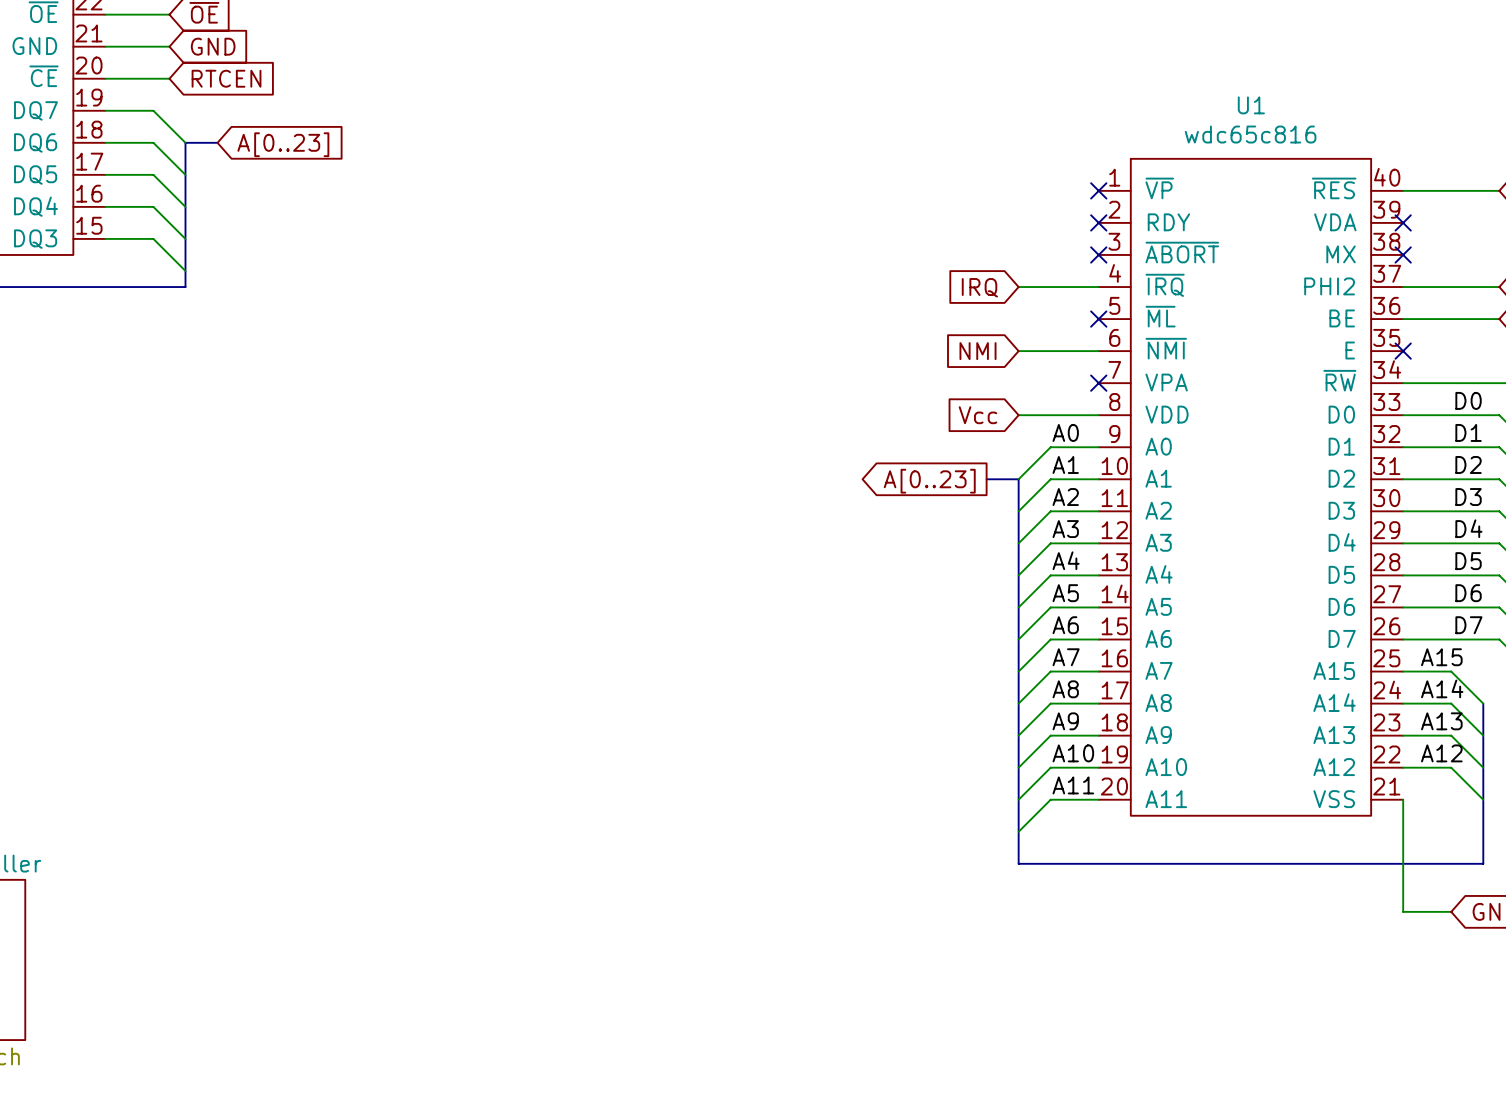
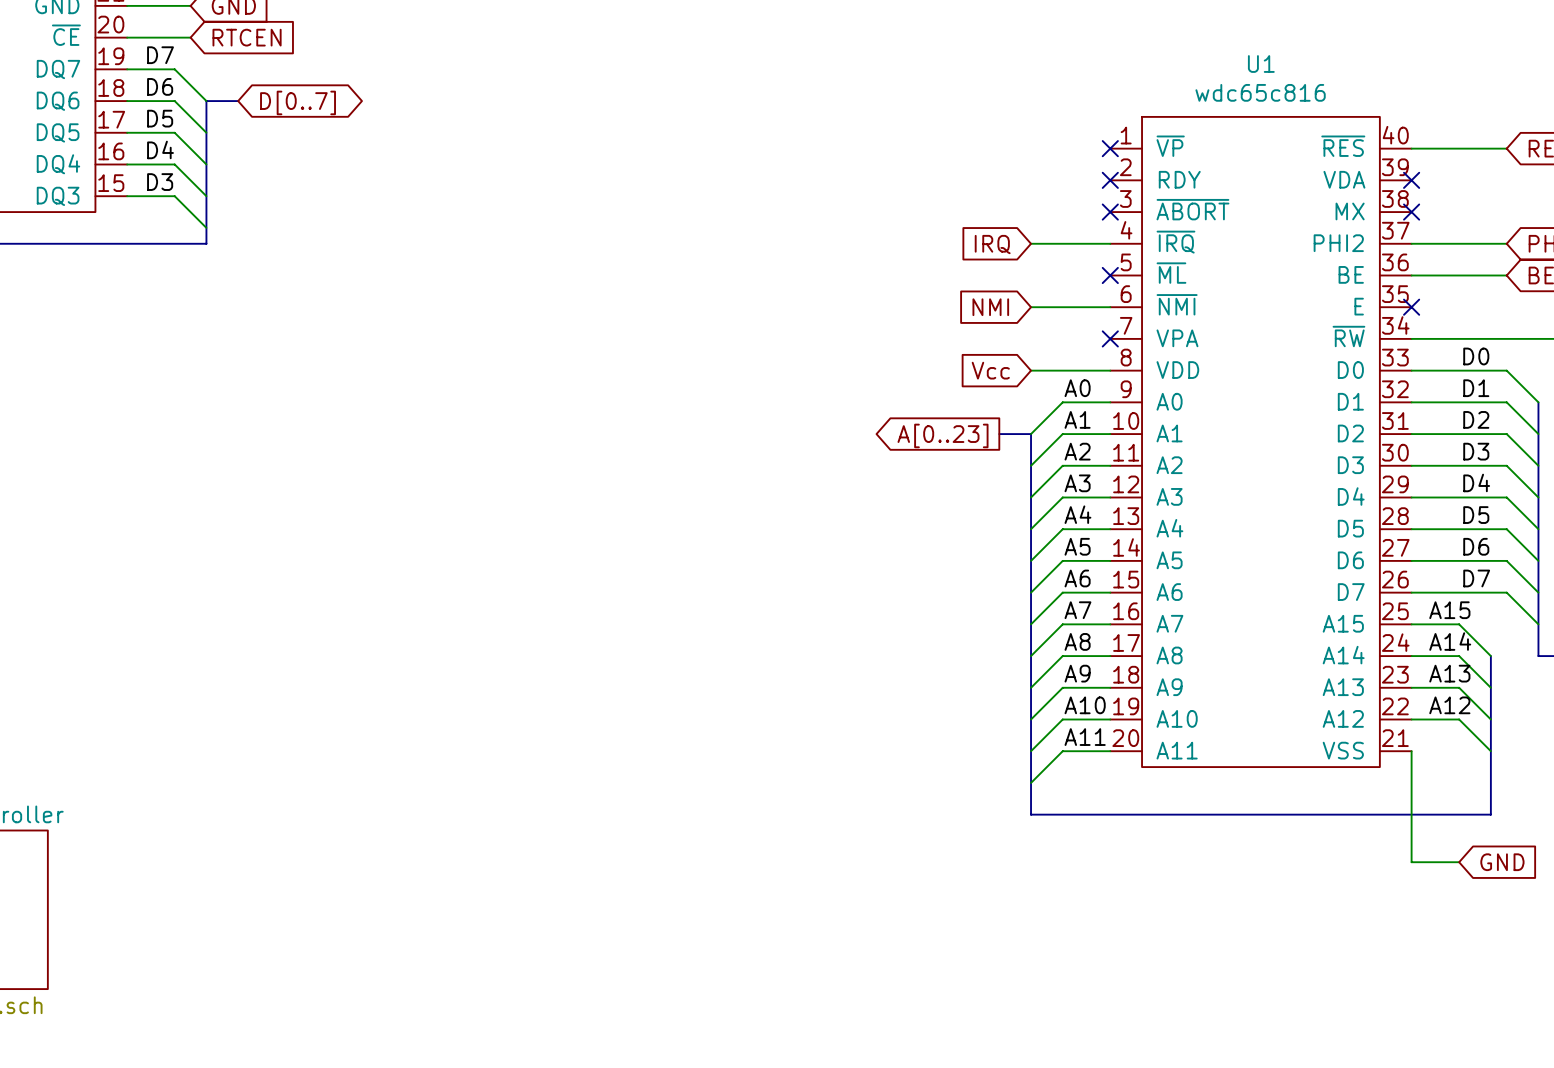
label: none -> D7 (160, 55)
label: none -> D6 (160, 86)
global label shape: input (283, 144) -> bidirectional (298, 102)
global label: A[0..23] (283, 144) -> D[0..7] (298, 102)
label: none -> D5 (160, 118)
label: none -> D4 (160, 149)
label: none -> D3 (160, 182)

